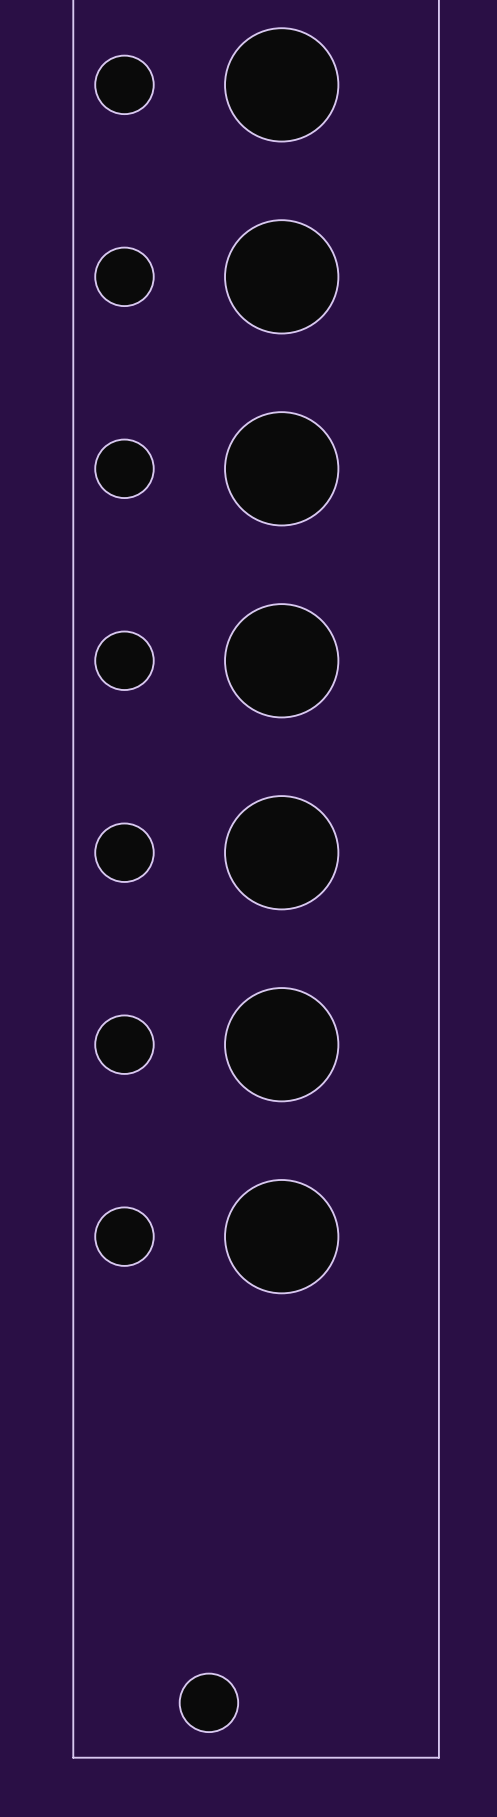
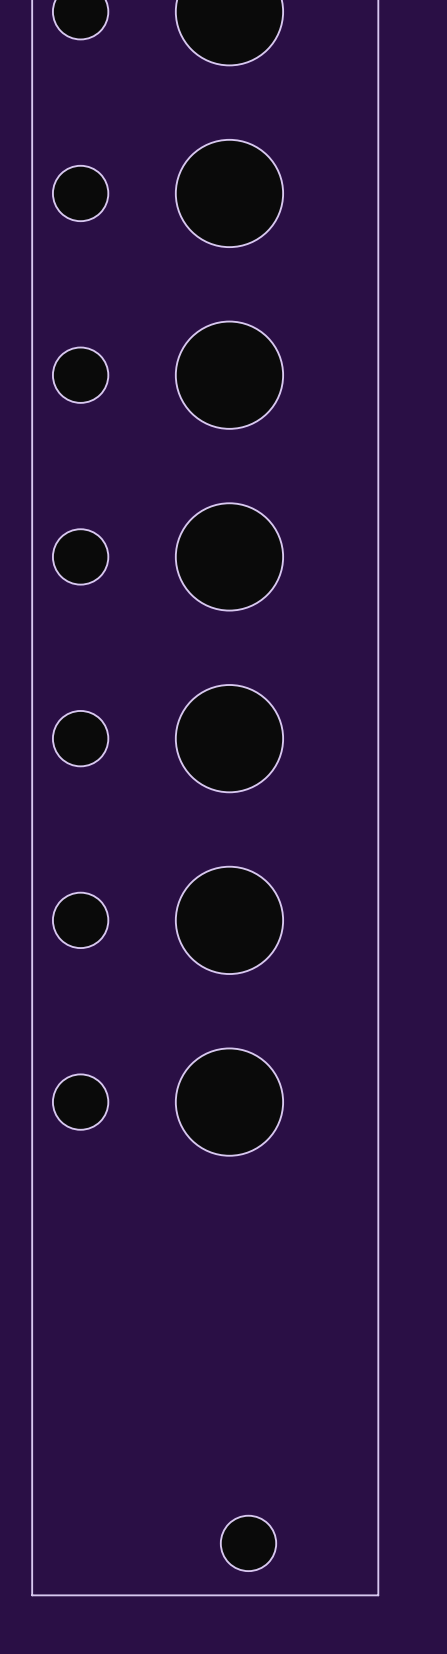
part position: (208, 1702) -> (248, 1543)

